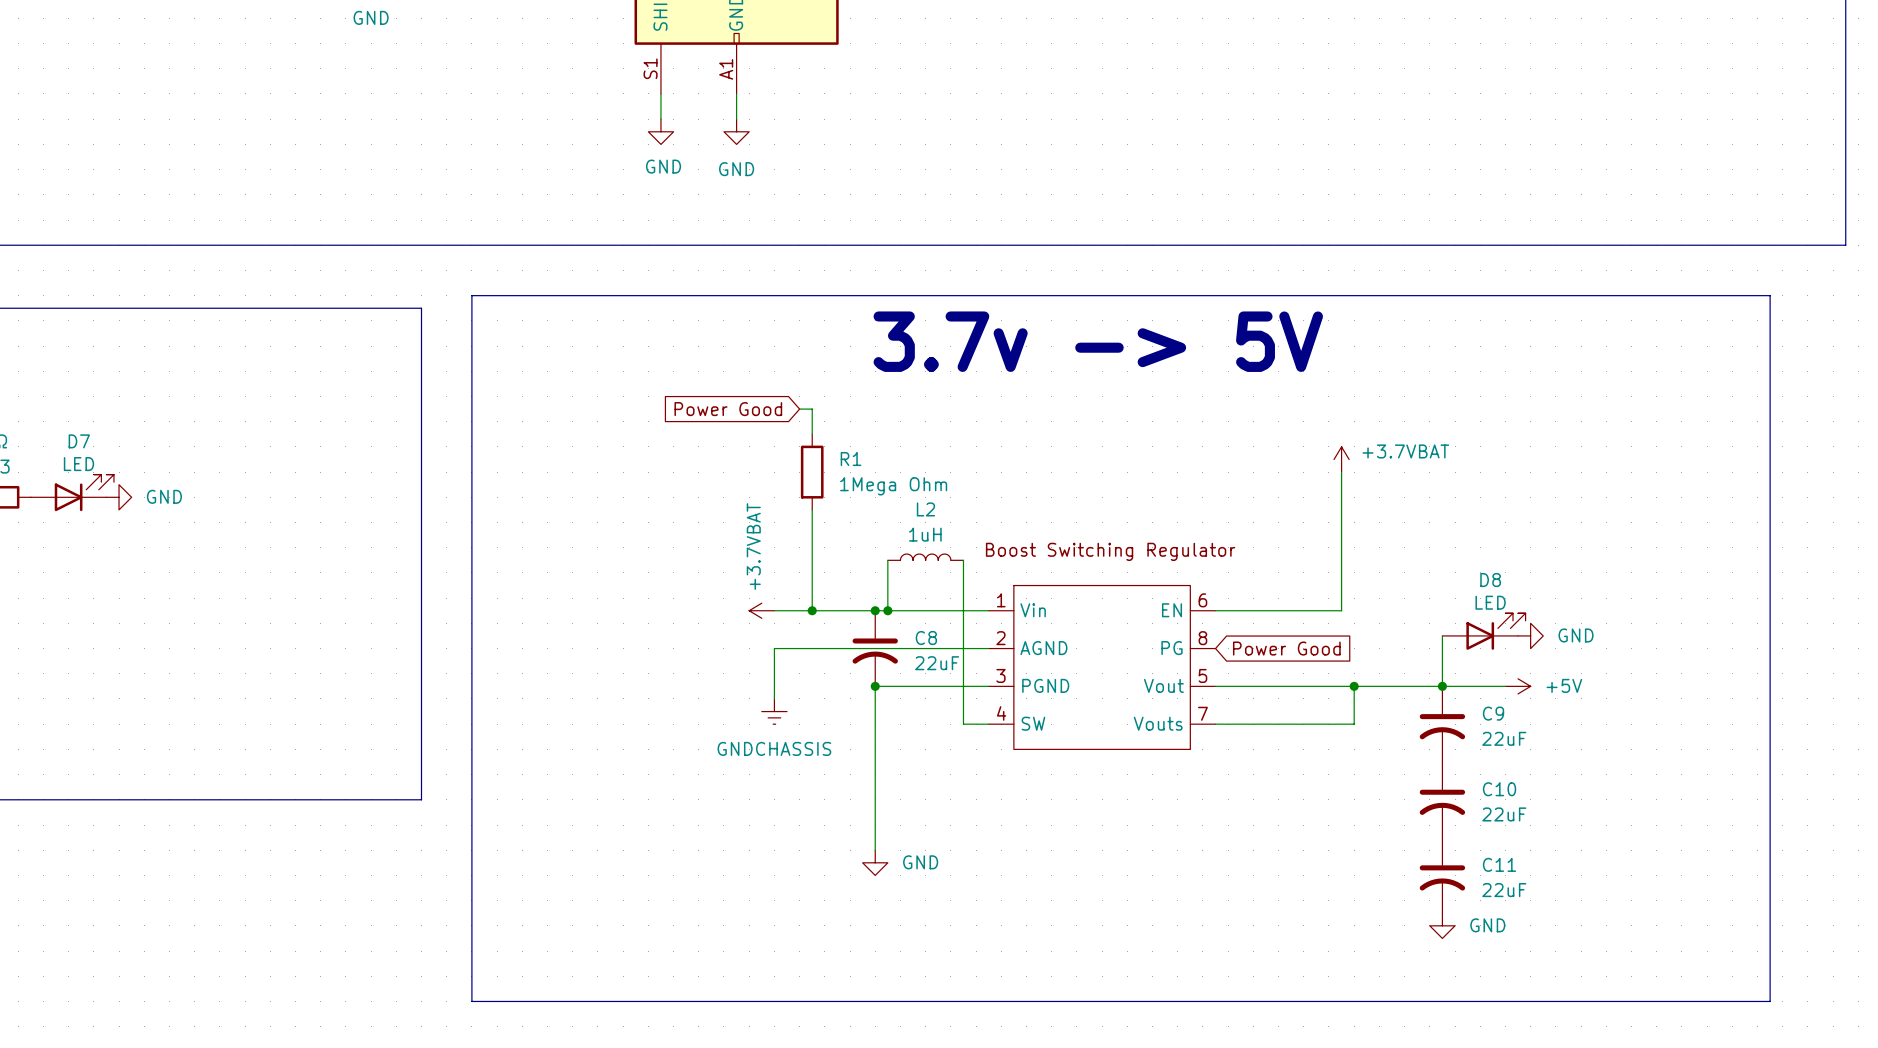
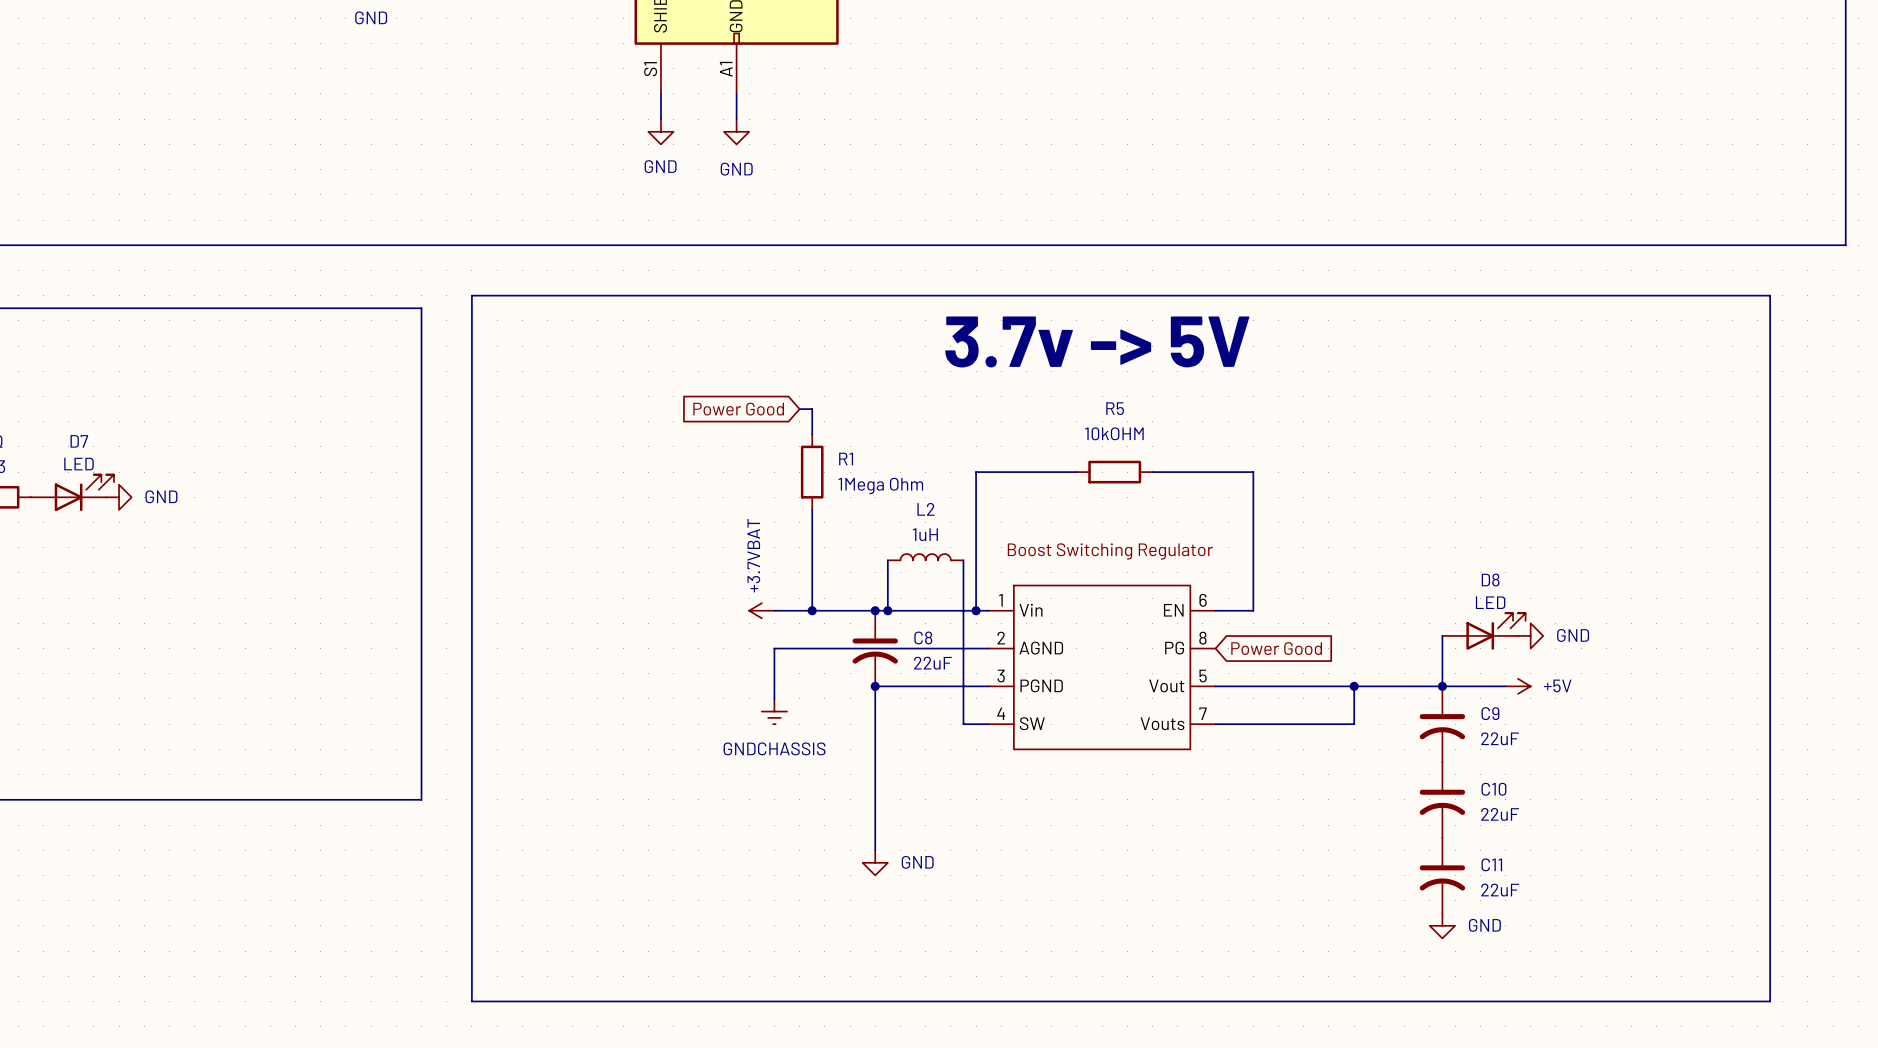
power symbol: +3.7VBAT (1341, 459) -> none
wire: none -> (1076, 472) (976, 472) (976, 610)
R5: none -> 10kOHM (1114, 472)
wire: (1341, 472) (1341, 610) (1253, 610) -> (1152, 472) (1253, 472) (1253, 610)
junction: none -> (976, 610)

